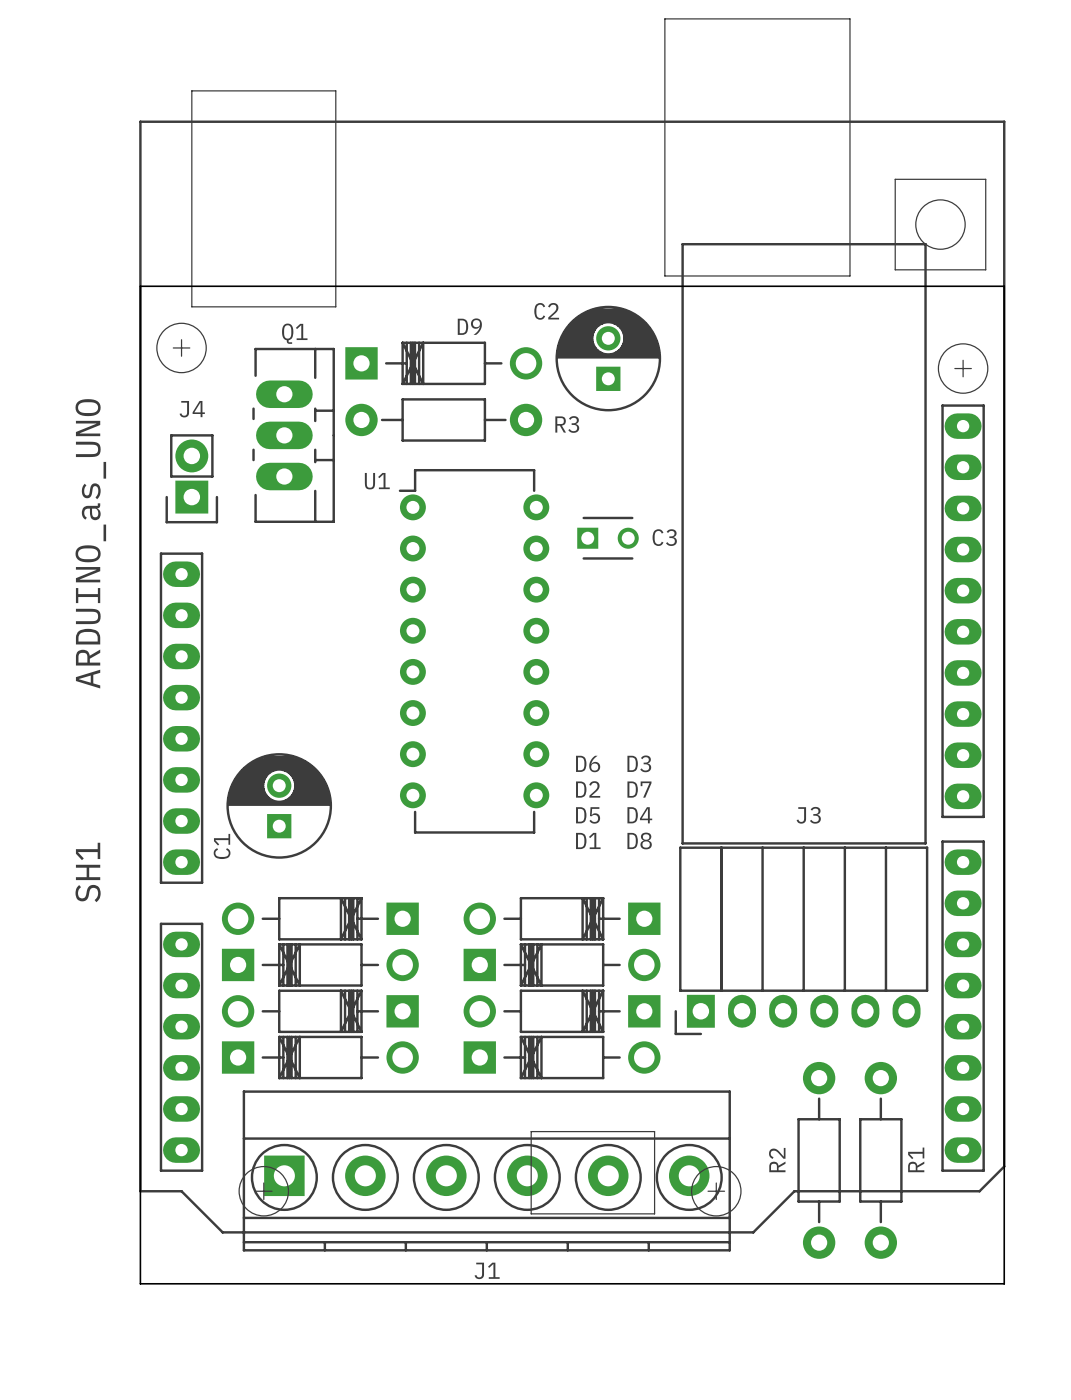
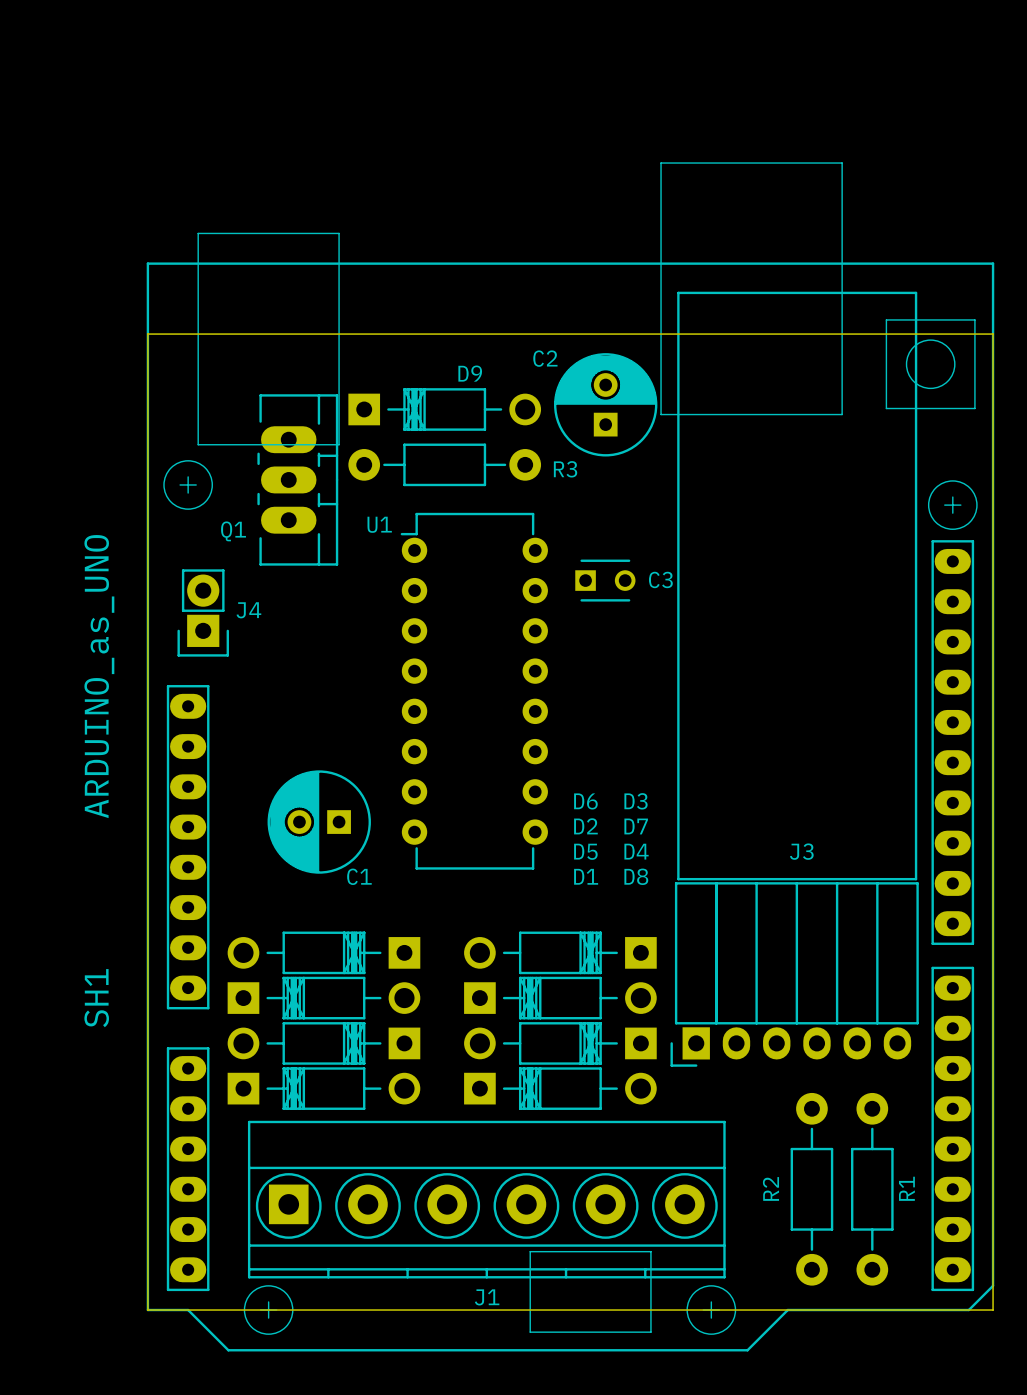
Q1 name position: Q1 (294, 333) -> Q1 (233, 531)
J4 name position: J4 (192, 409) -> J4 (248, 610)
J4 position: (191, 478) -> (203, 612)
SH1 position: (572, 626) -> (570, 757)
C1 rotation: 0° (279, 805) -> 90° counterclockwise (319, 822)

